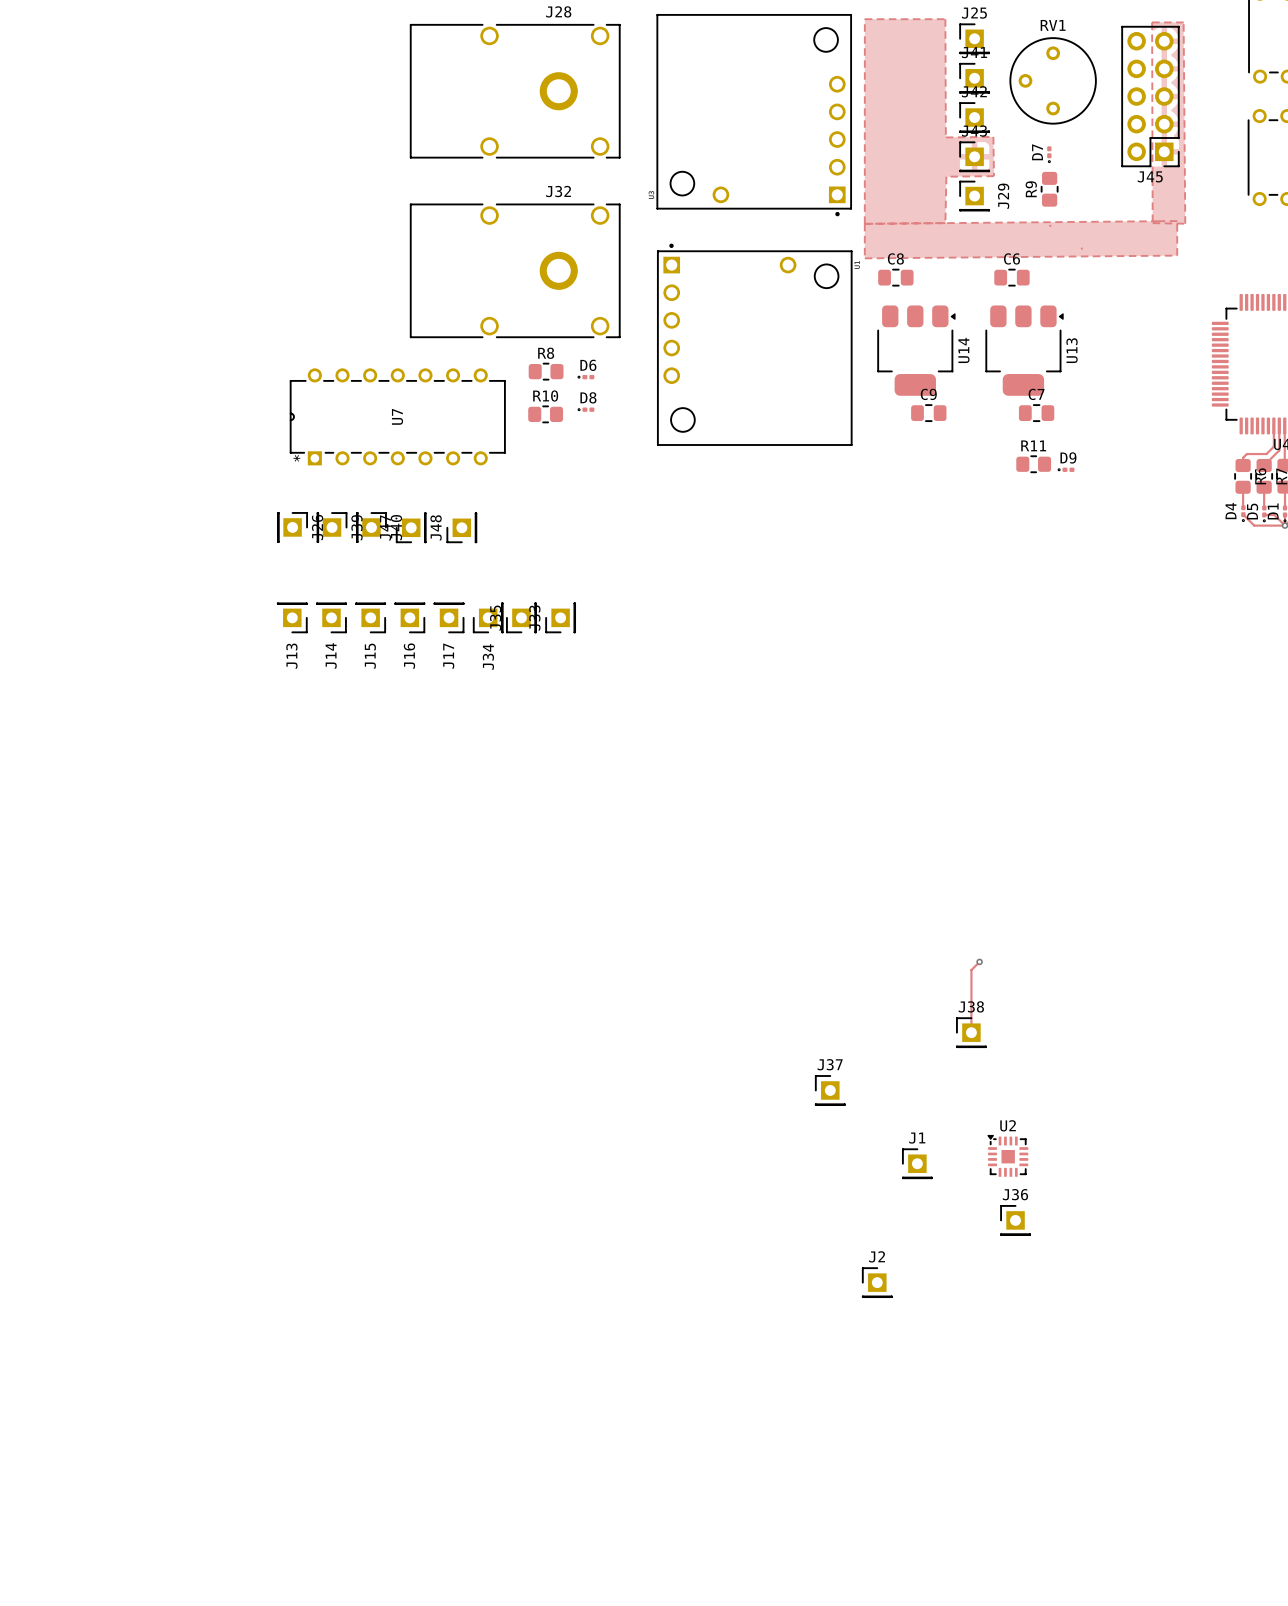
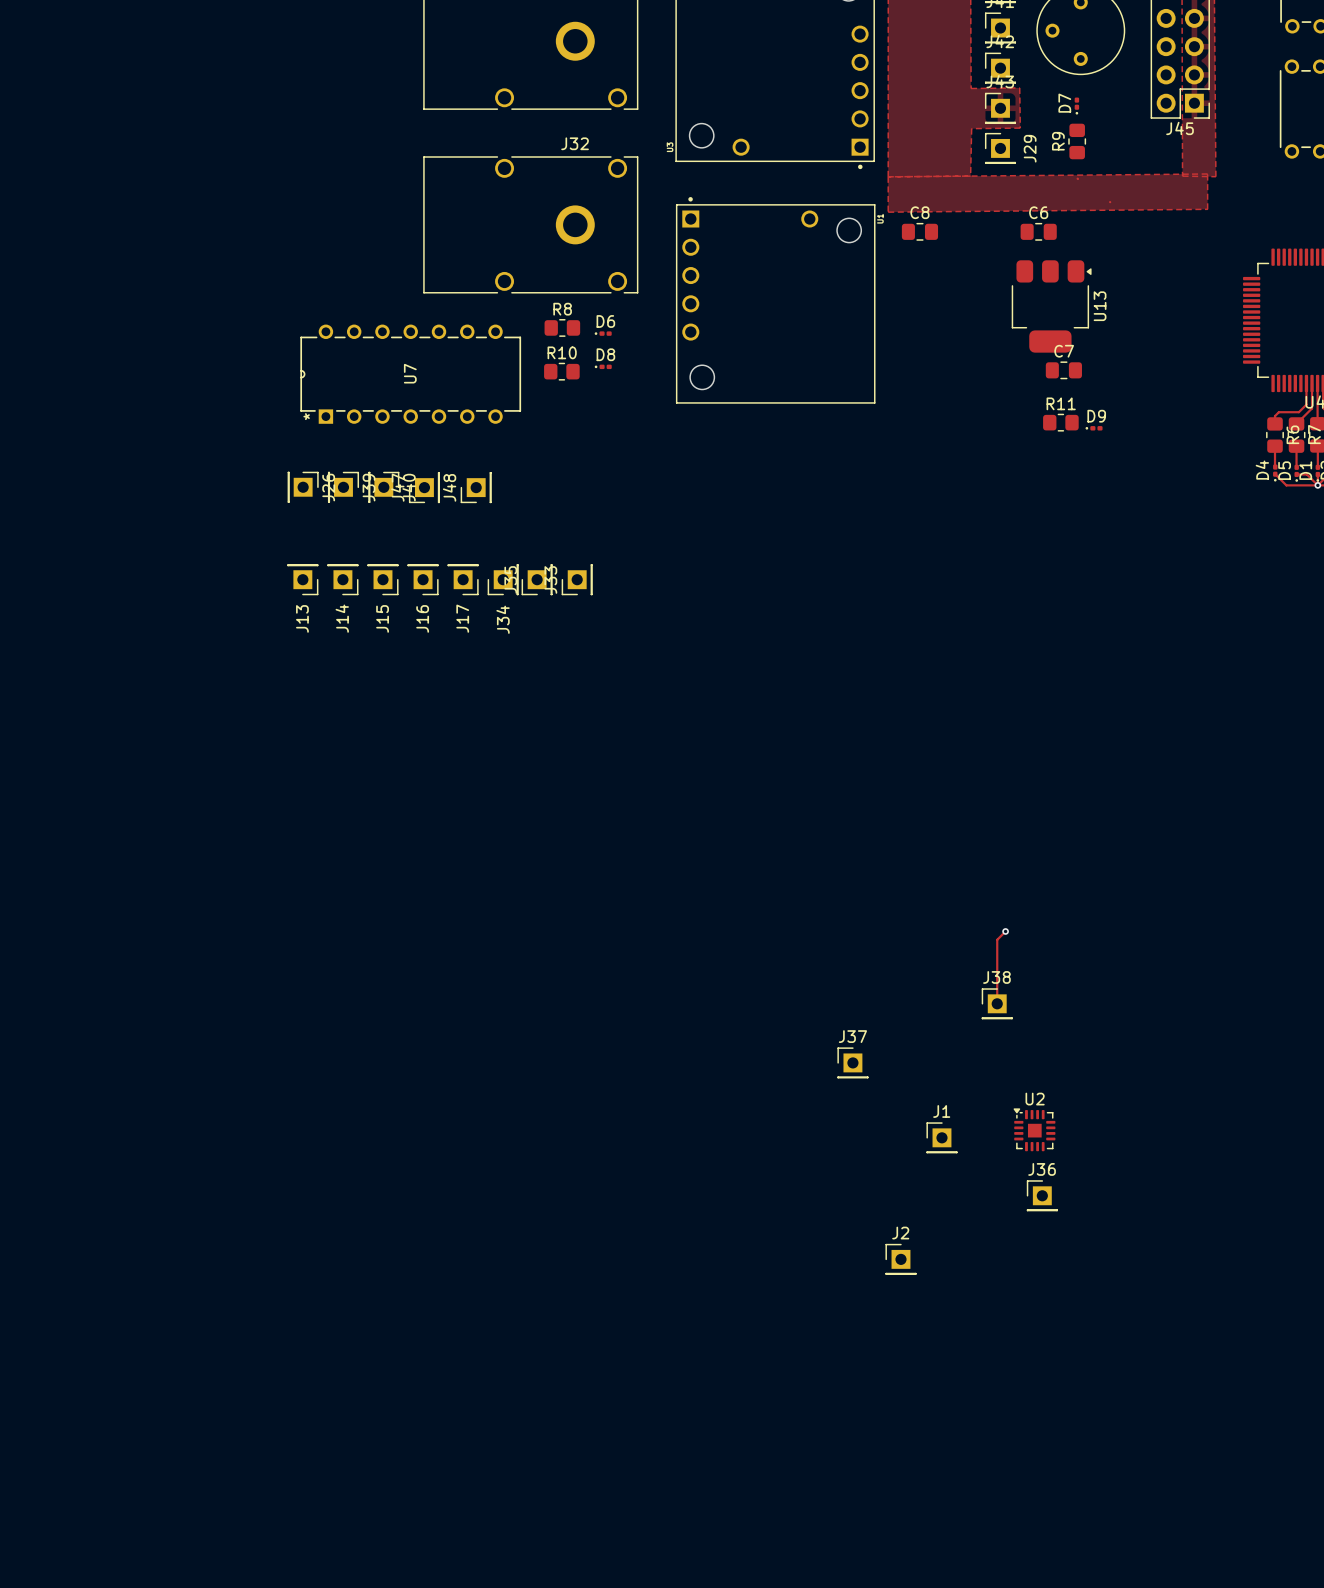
U14: (916, 350) -> none
C9: (928, 413) -> none

